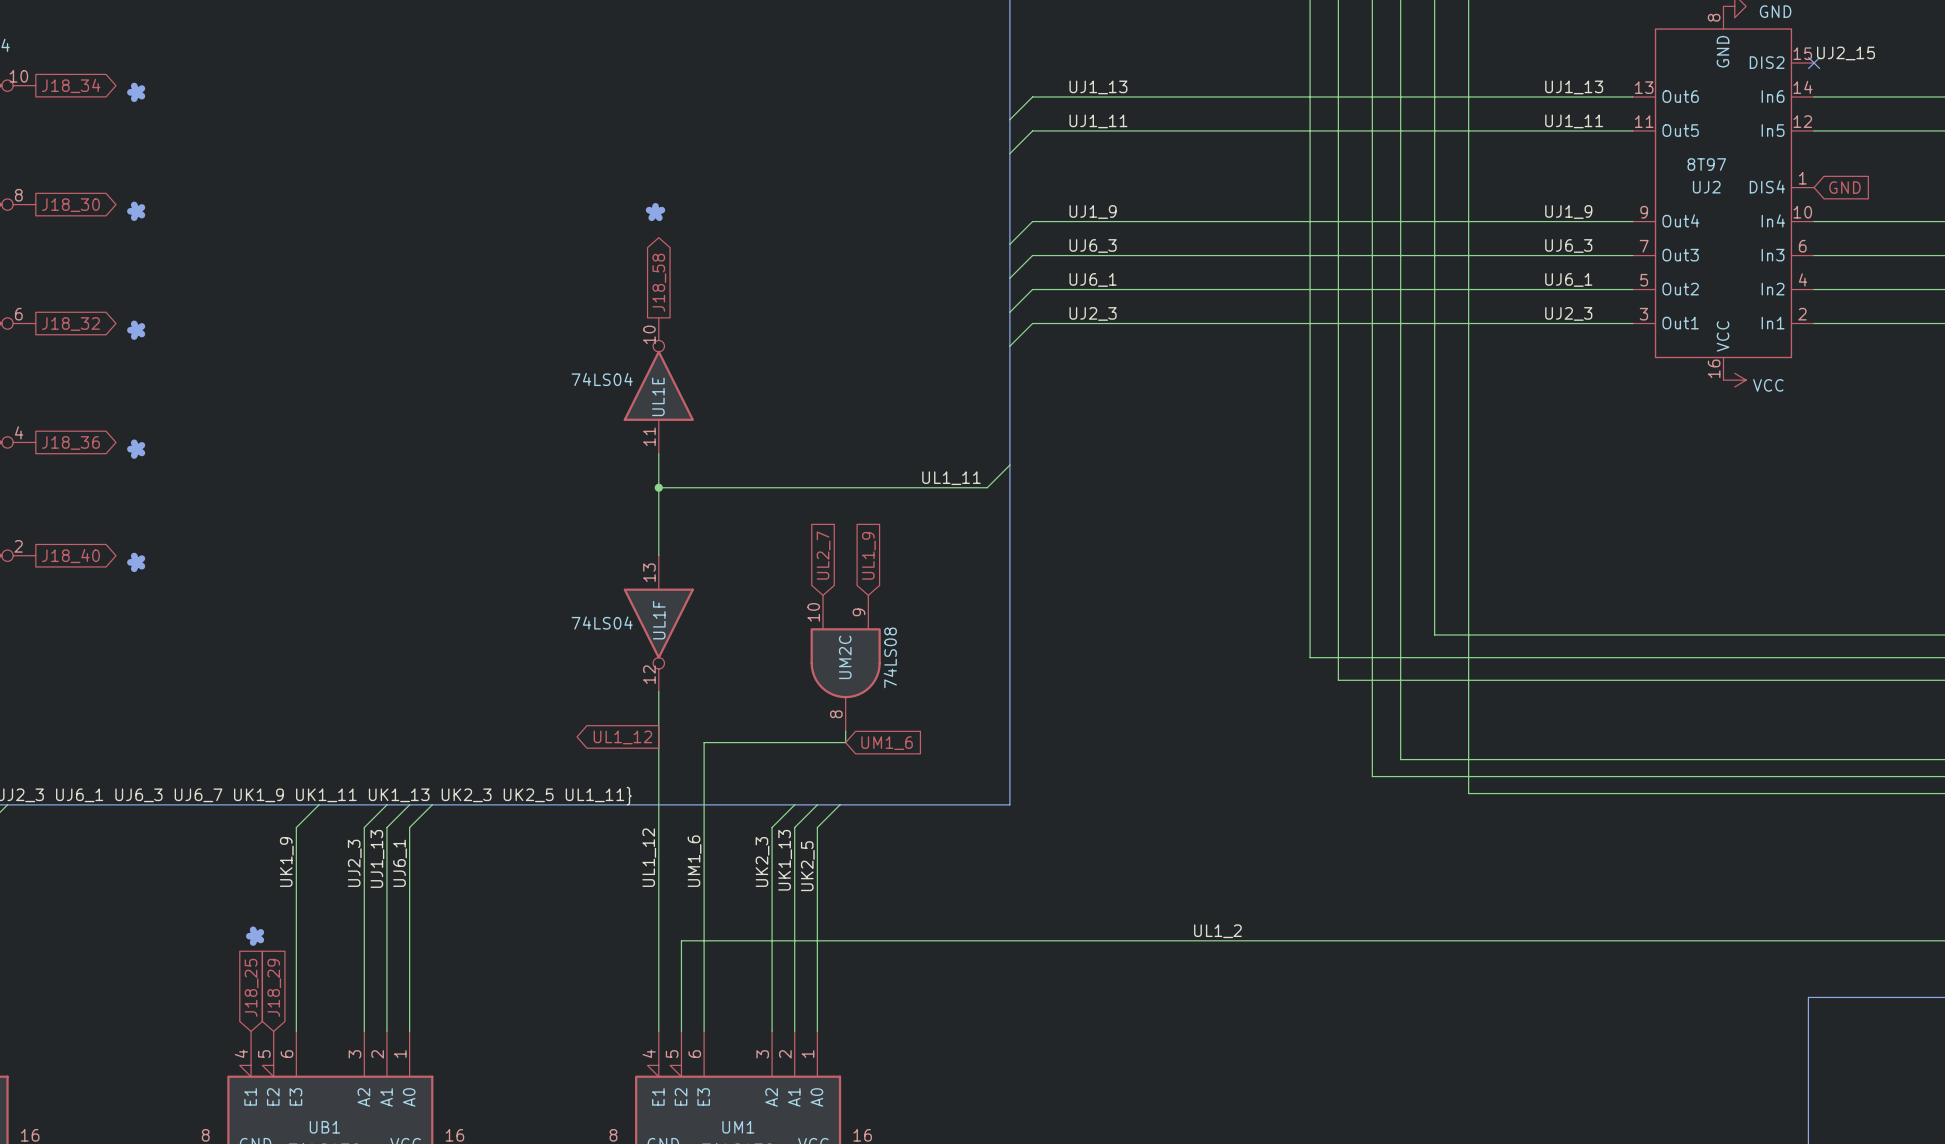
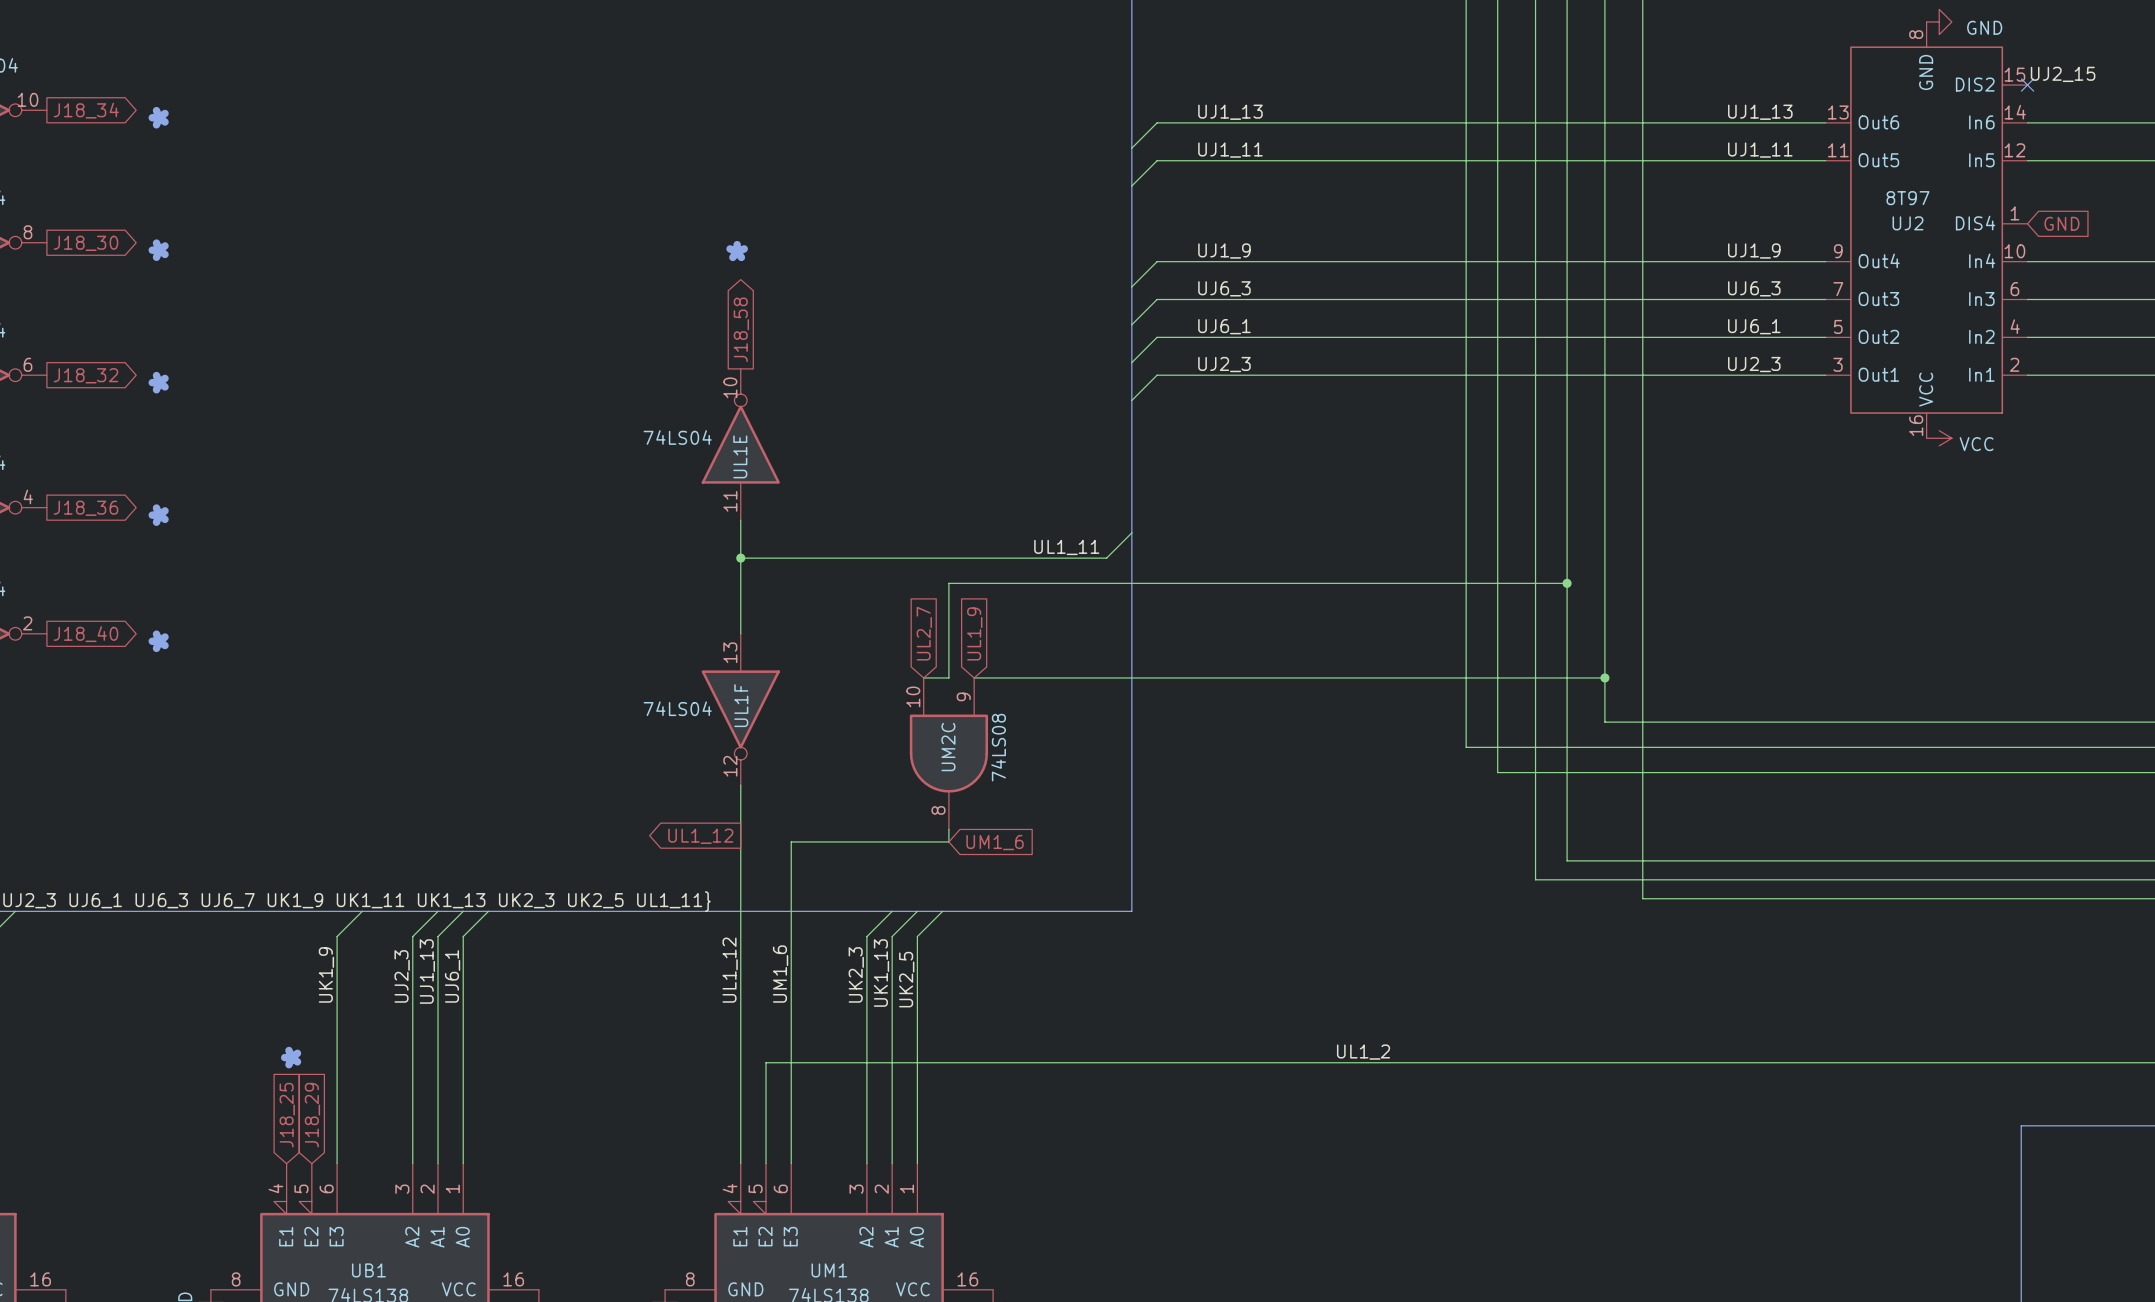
wire: none -> (1567, 583) (948, 583) (948, 677) (923, 677)
junction: none -> (1567, 583)
wire: none -> (974, 677) (1604, 677)
junction: none -> (1604, 677)

